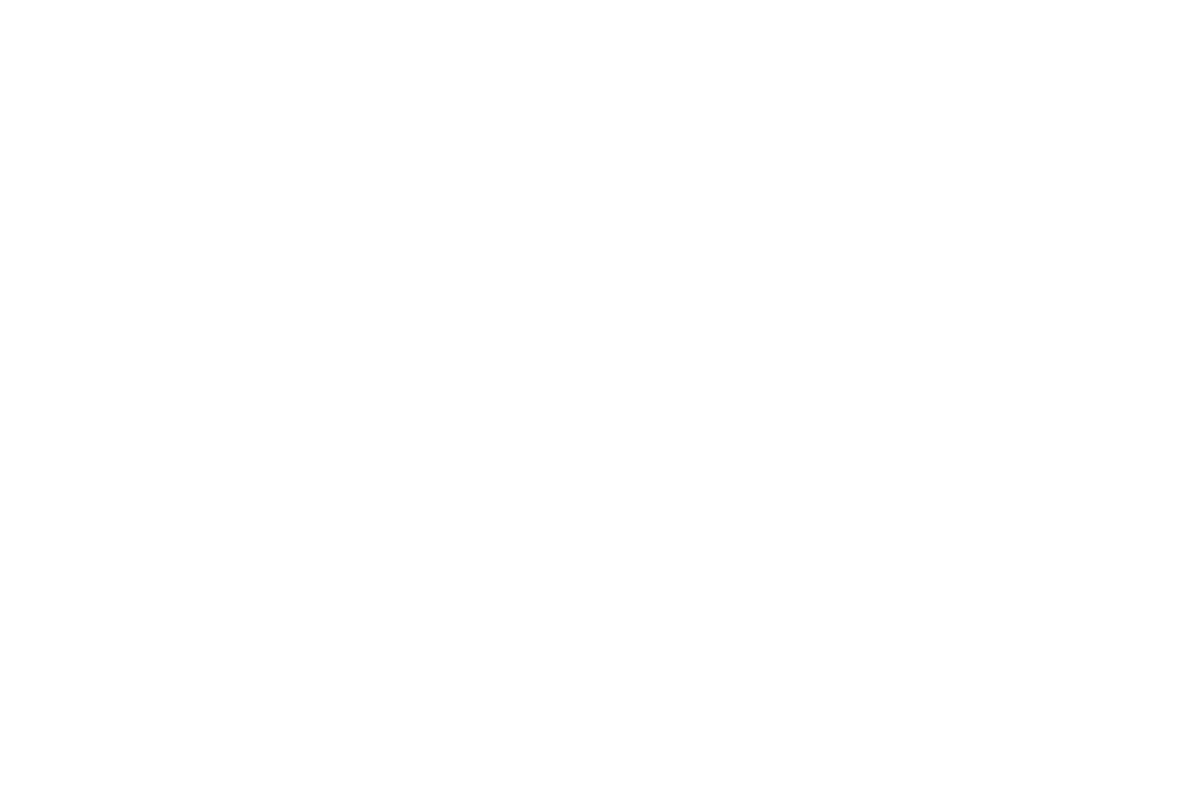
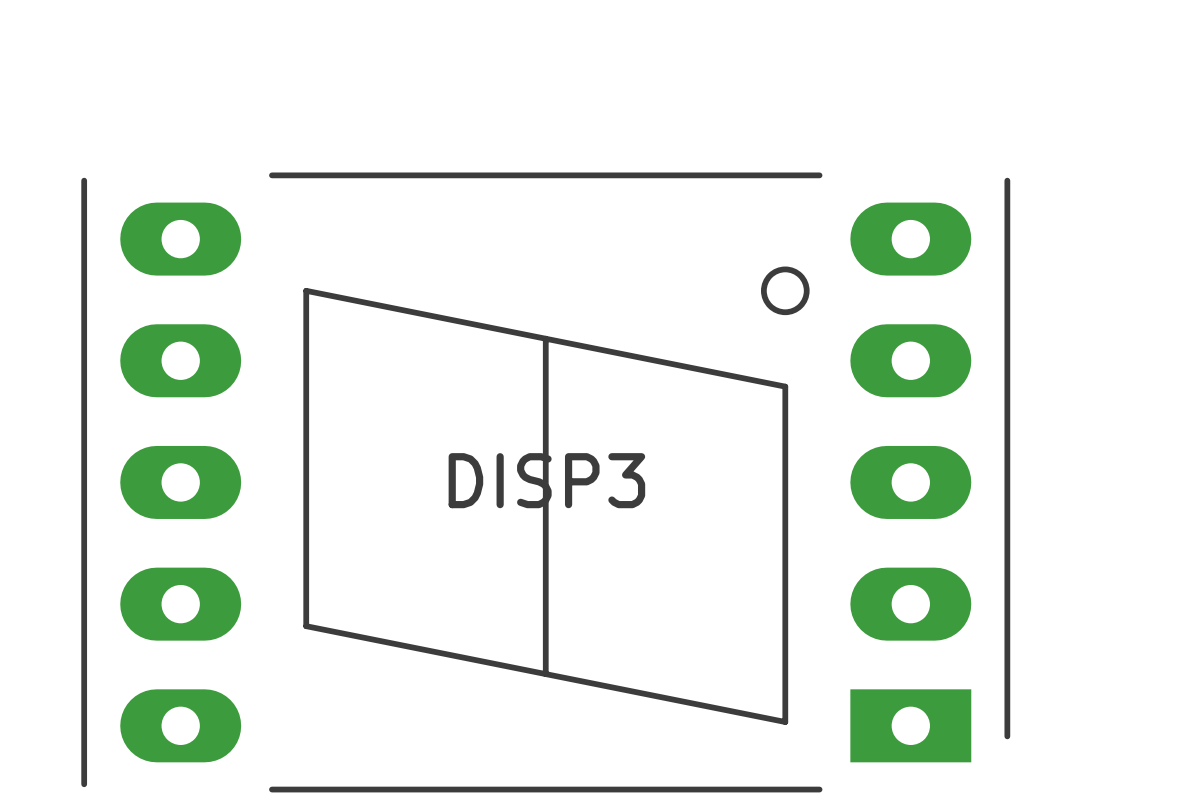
DISP3: none -> (545, 482)

